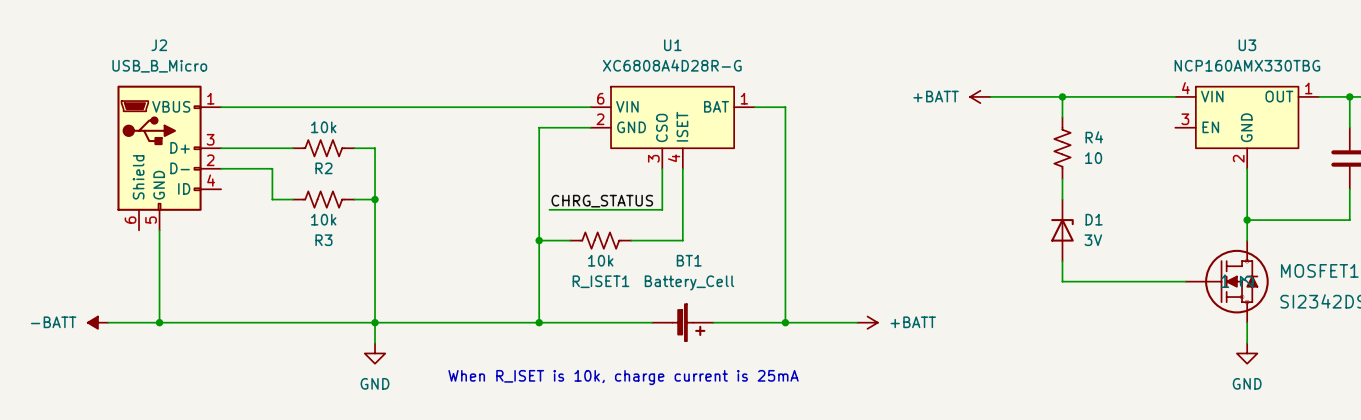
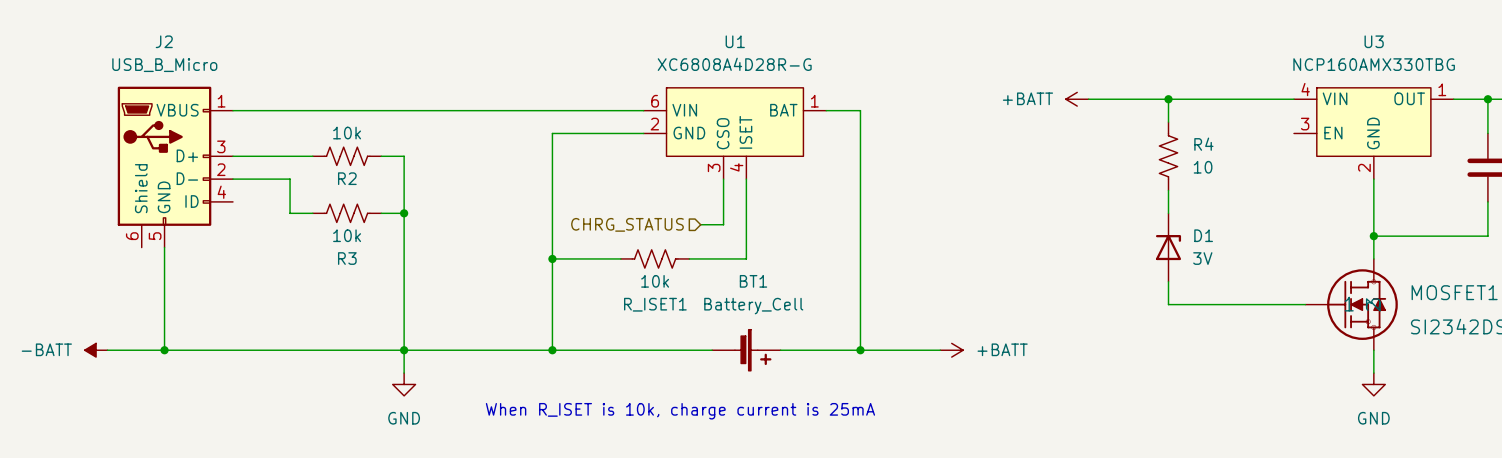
wire: (539, 127) (539, 322) -> (586, 133) (552, 133) (552, 350)
label: CHRG_STATUS (602, 201) -> none
wire: (549, 209) (641, 209) -> none
hierarchical label: none -> CHRG_STATUS (627, 224)
wire: none -> (552, 258) (586, 258)
junction position: (539, 240) -> (552, 258)
junction position: (539, 322) -> (552, 350)

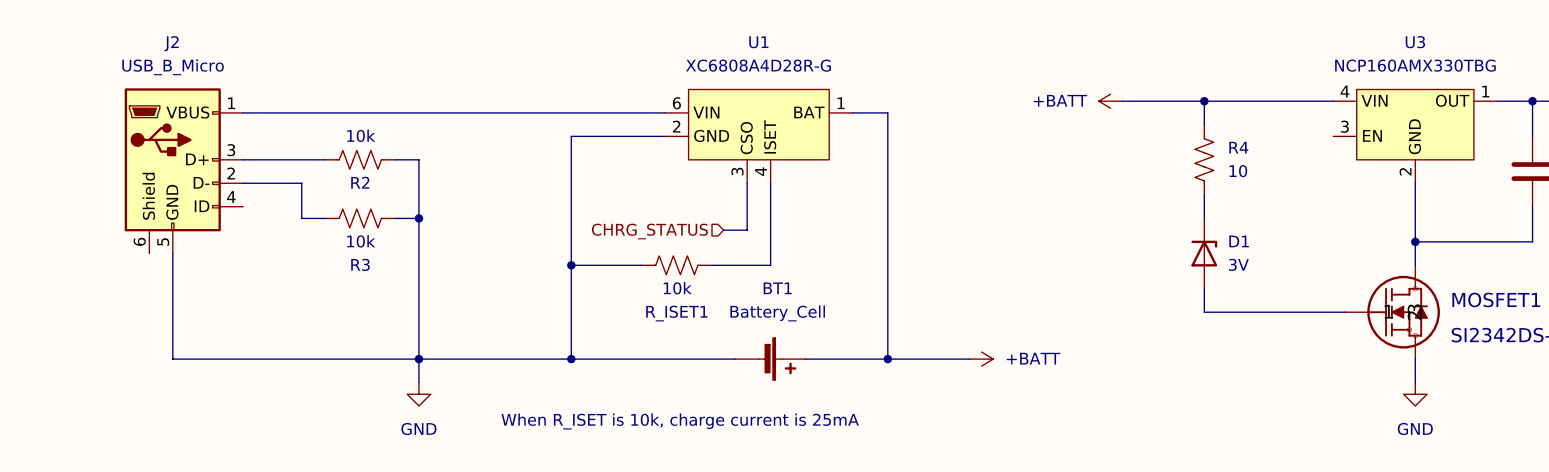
power symbol: -BATT (96, 350) -> none
wire: (107, 350) (164, 350) -> none
junction: (164, 350) -> none

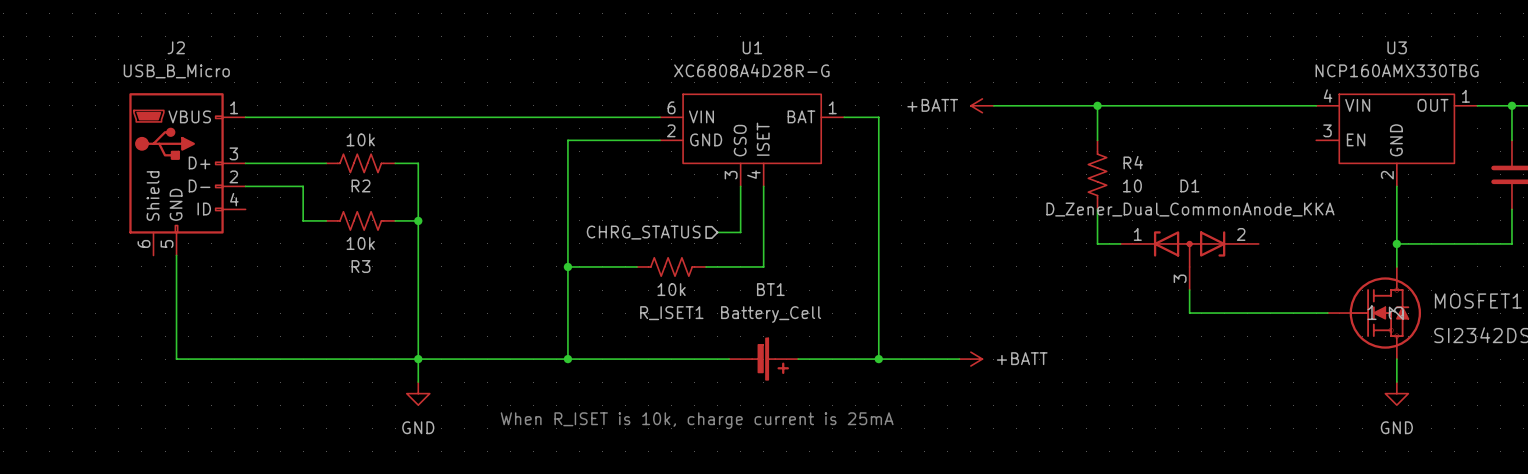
wire: none -> (993, 105) (1109, 105)
wire: none -> (1097, 105) (1097, 140)
junction: none -> (1097, 105)
power symbol position: +BATT (1110, 101) -> +BATT (982, 105)
wire: (1204, 101) (1204, 124) -> none
junction: (1204, 101) -> none
R4 position: (1204, 159) -> (1097, 174)
wire: (1204, 194) (1204, 218) -> none
wire: none -> (1097, 209) (1097, 243) (1120, 243)
D1 symbol: [1191, 218, 1218, 289] -> [1120, 231, 1259, 291]
D1 name position: D1 (1239, 241) -> D1 (1189, 185)
D1 value: 3V (1238, 264) -> D_Zener_Dual_CommonAnode_KKA (1190, 209)

